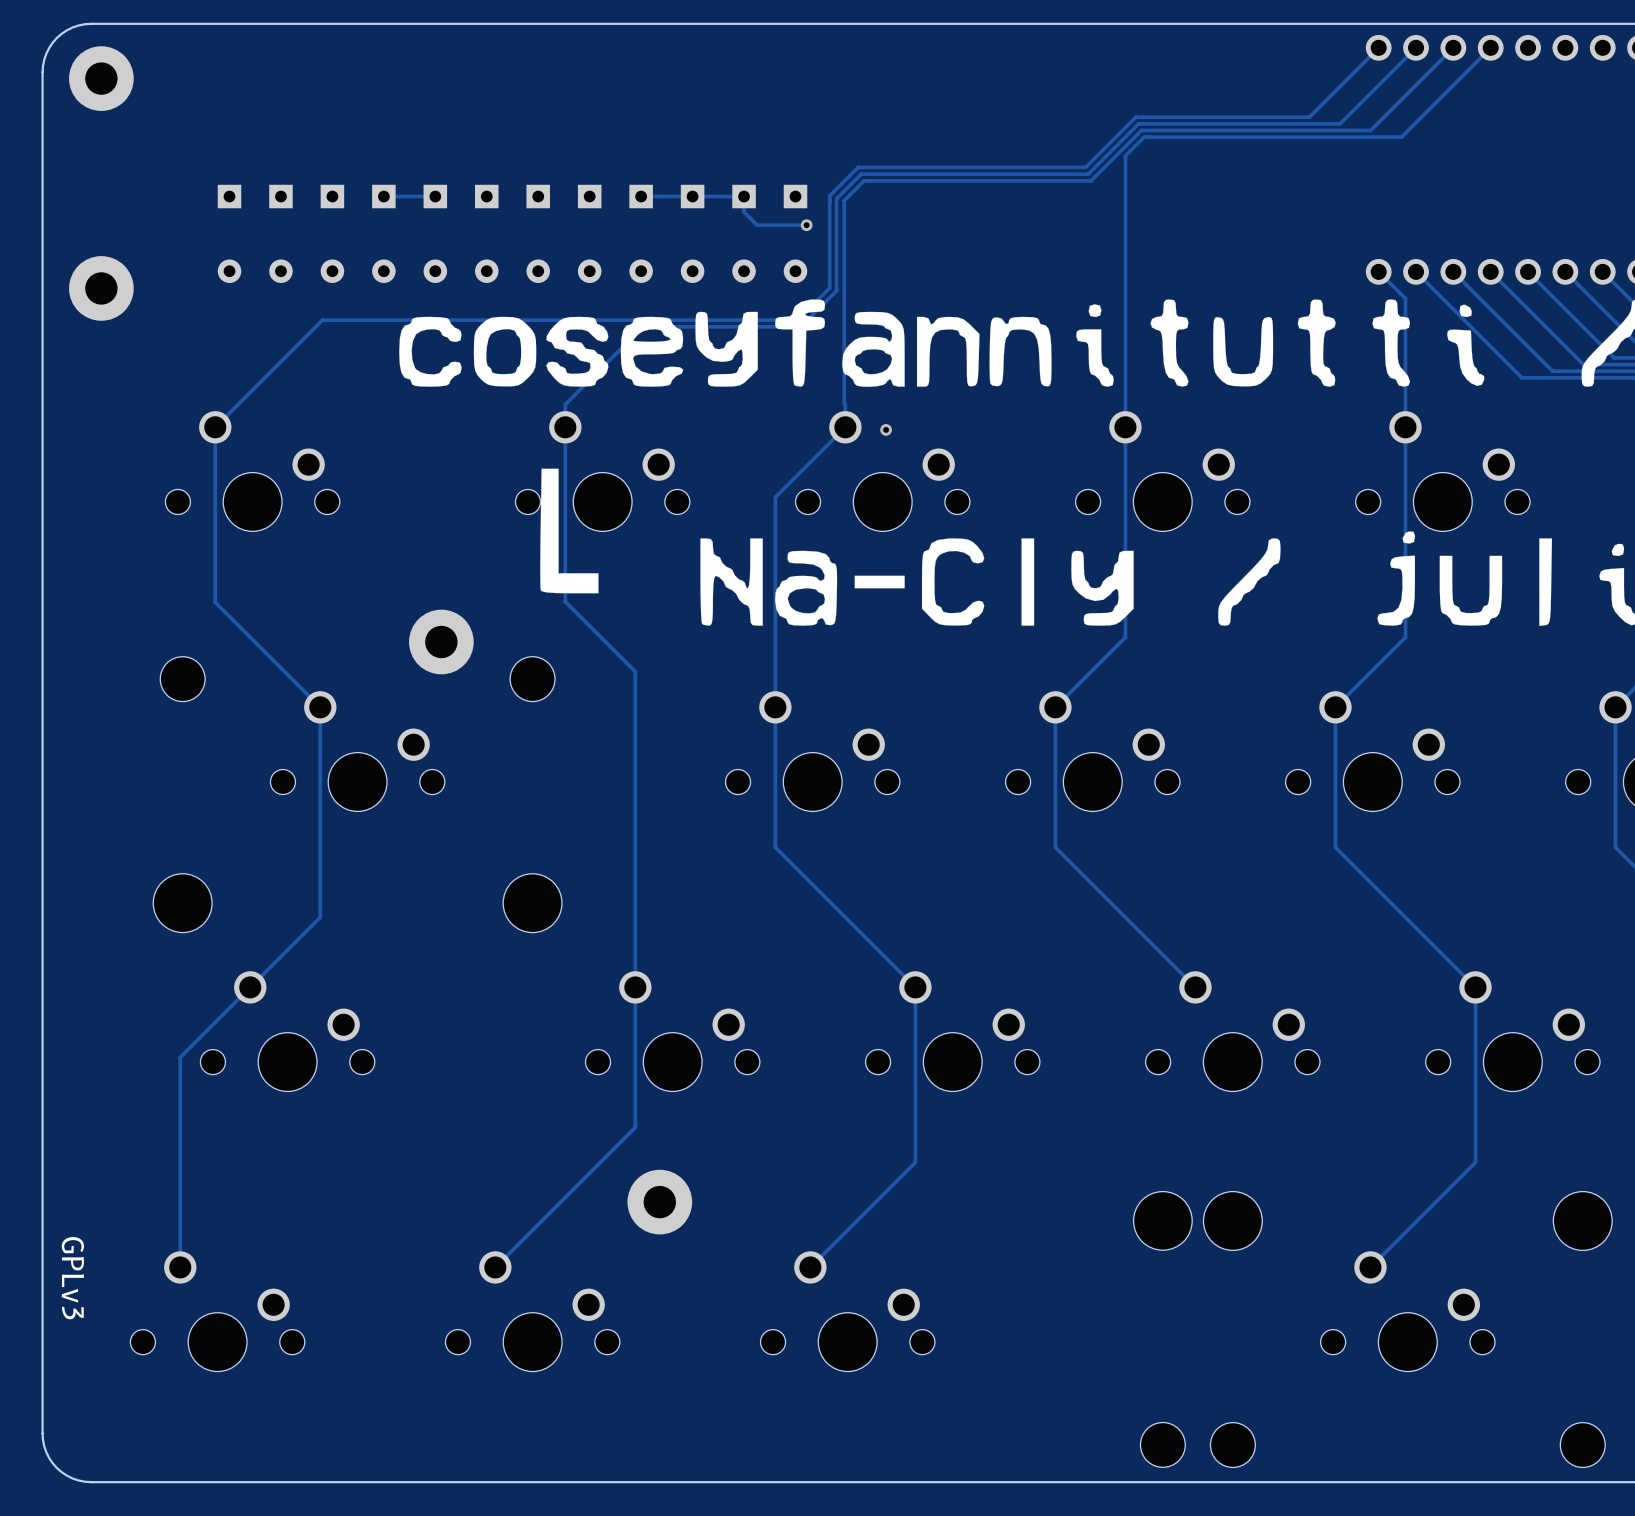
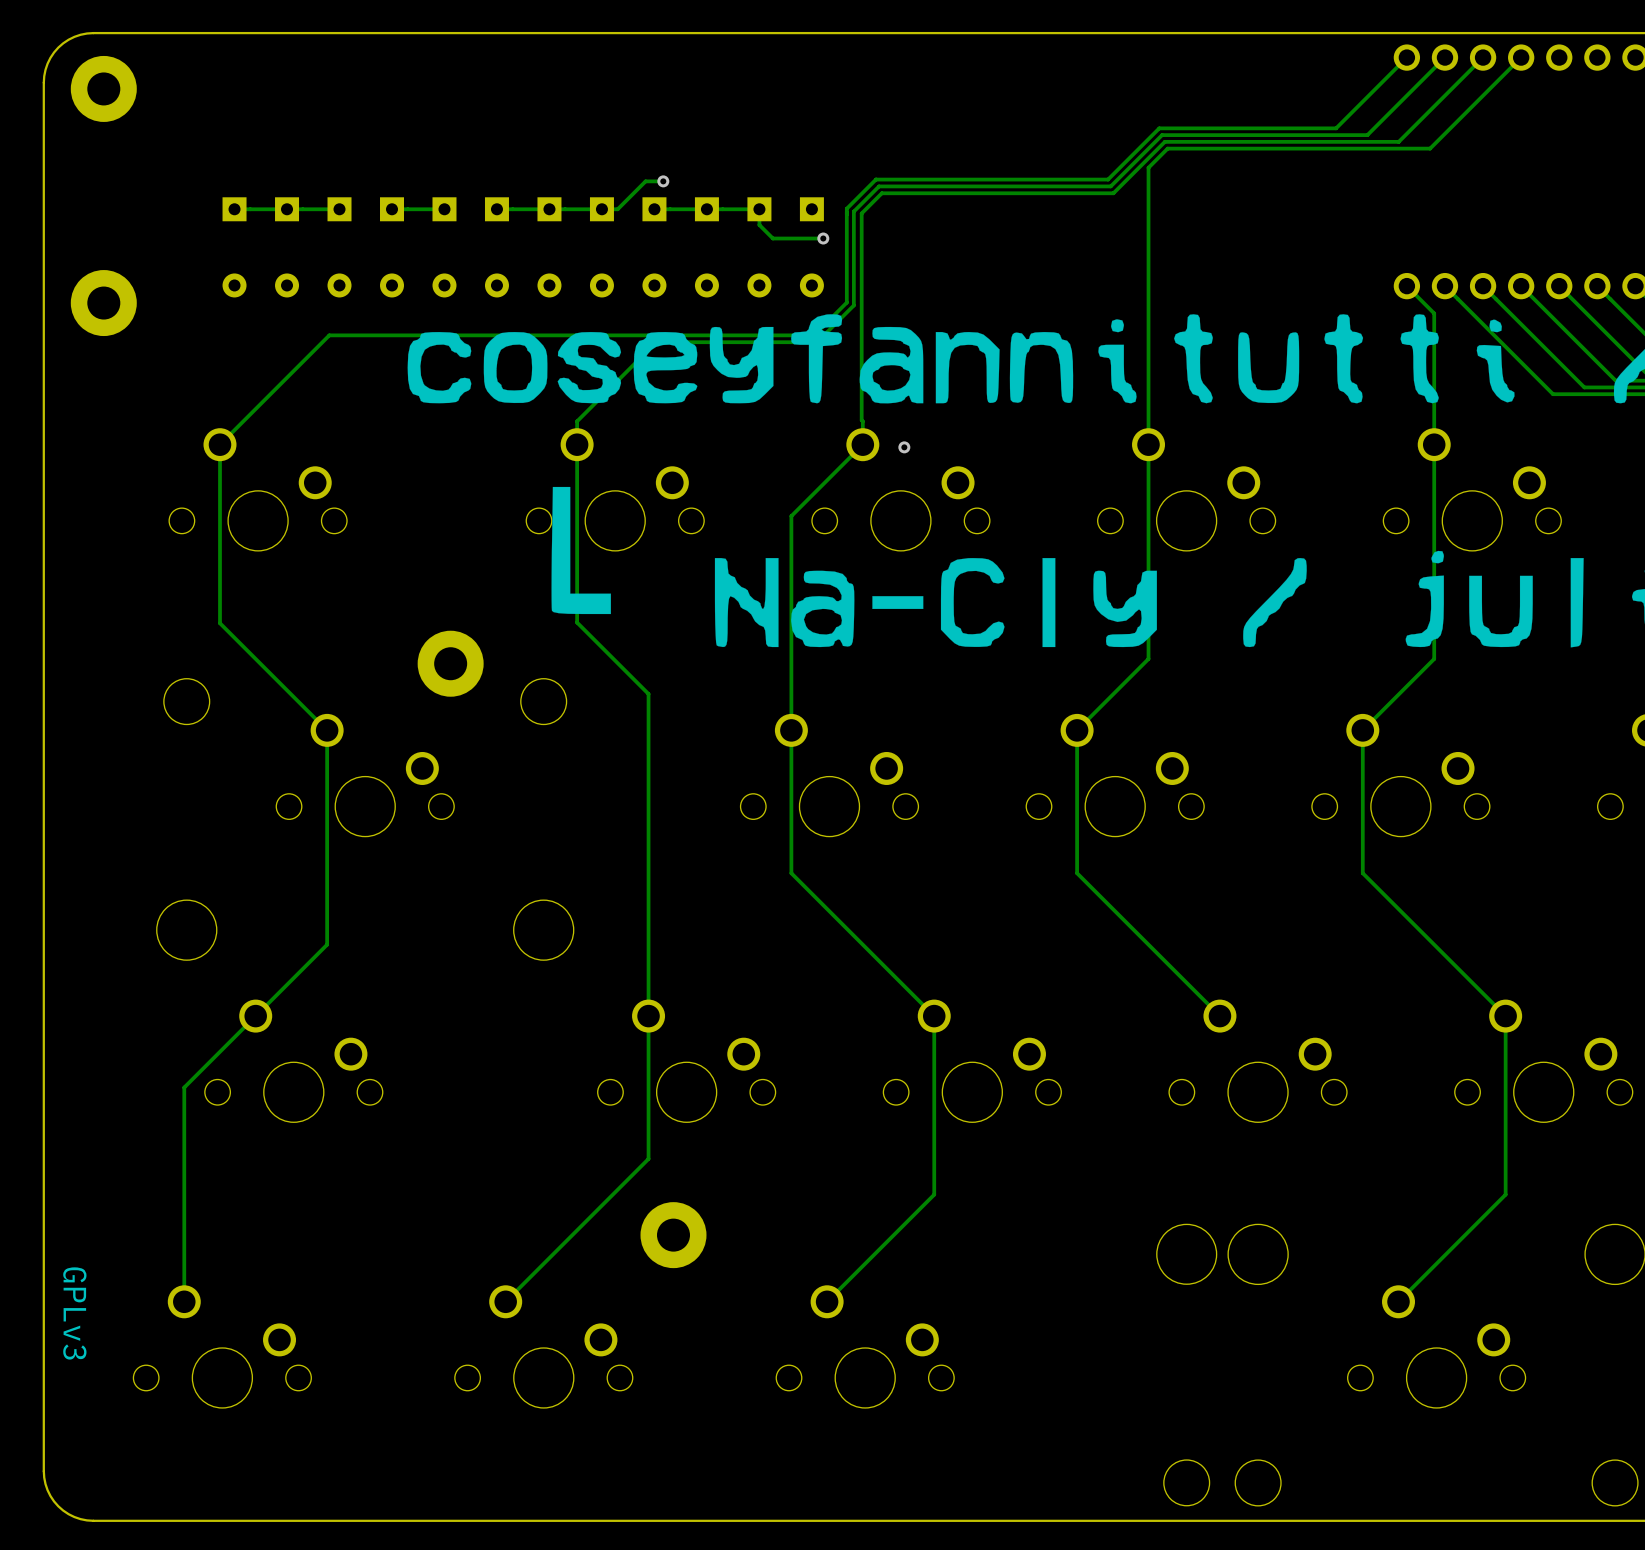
track: none -> (663, 181) (645, 181) (617, 209) (496, 209)
via: none -> (663, 181)
track: none -> (339, 209) (234, 209)

